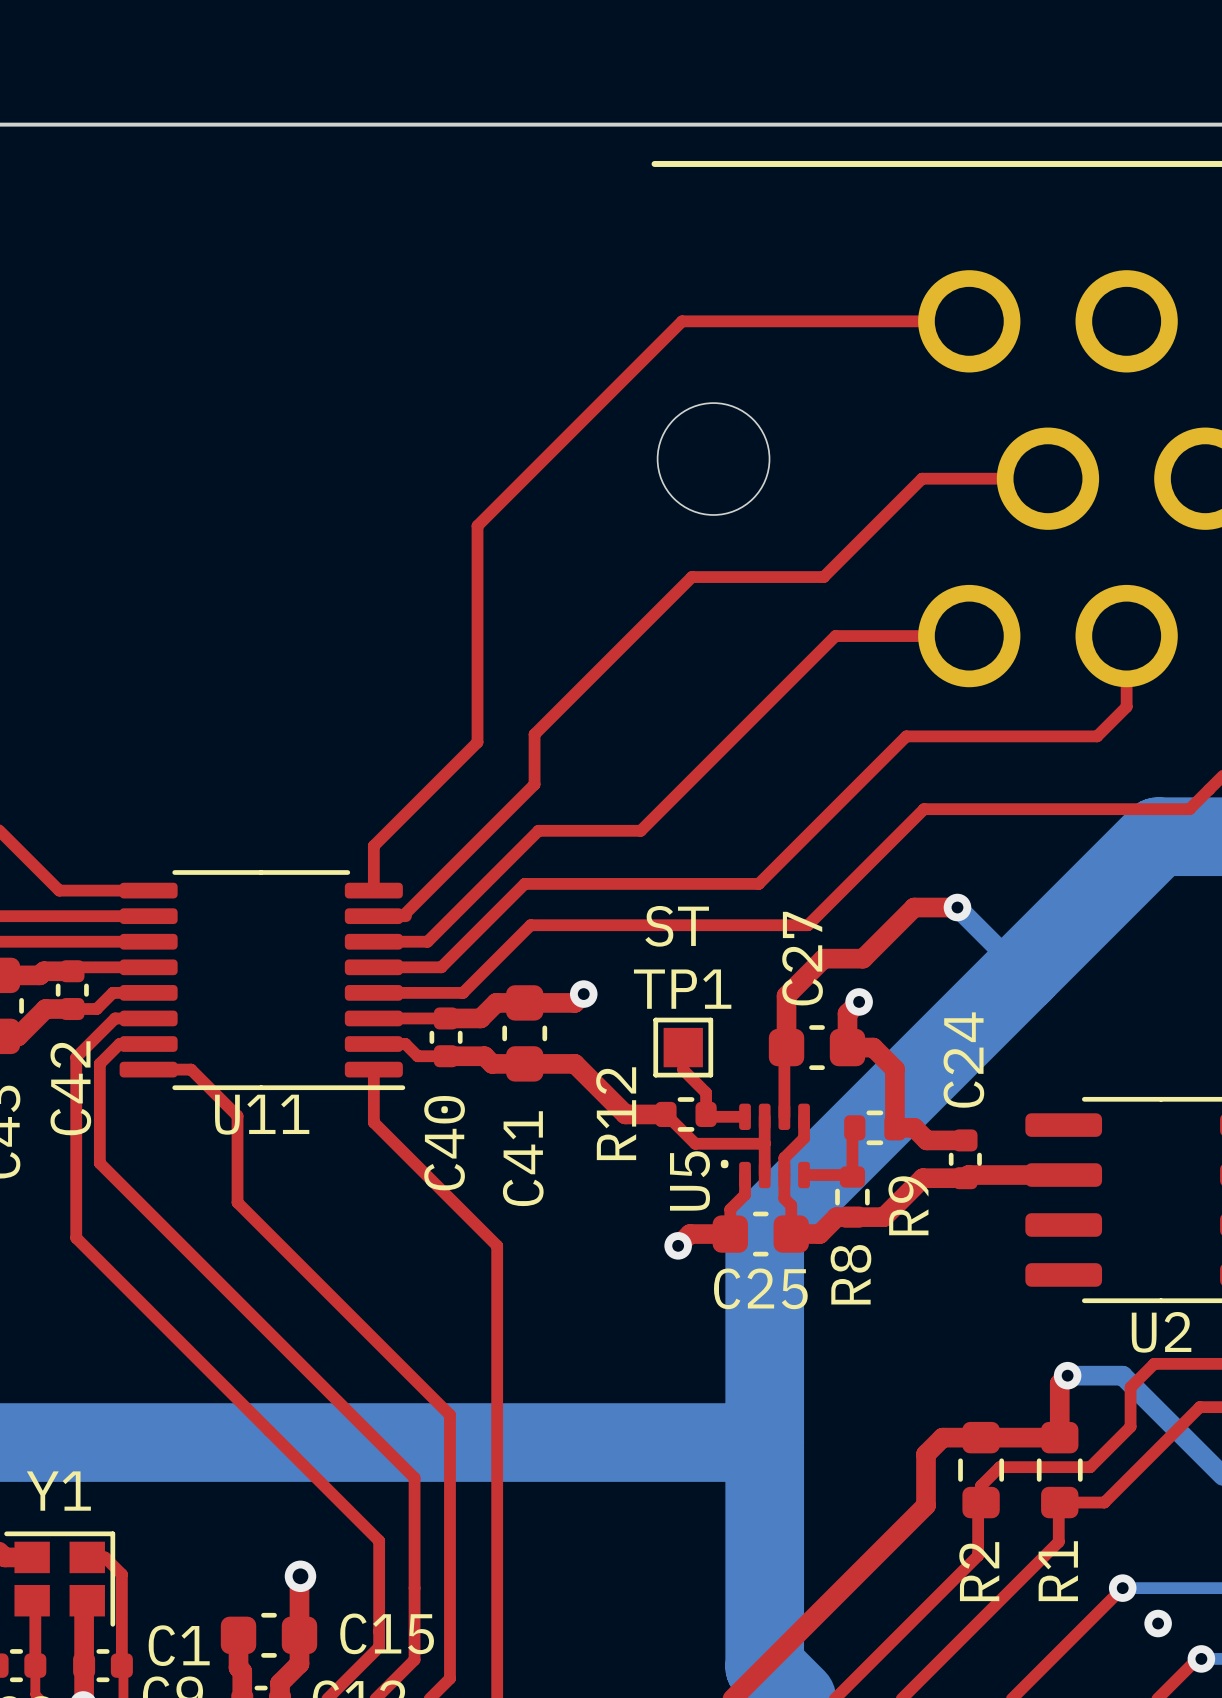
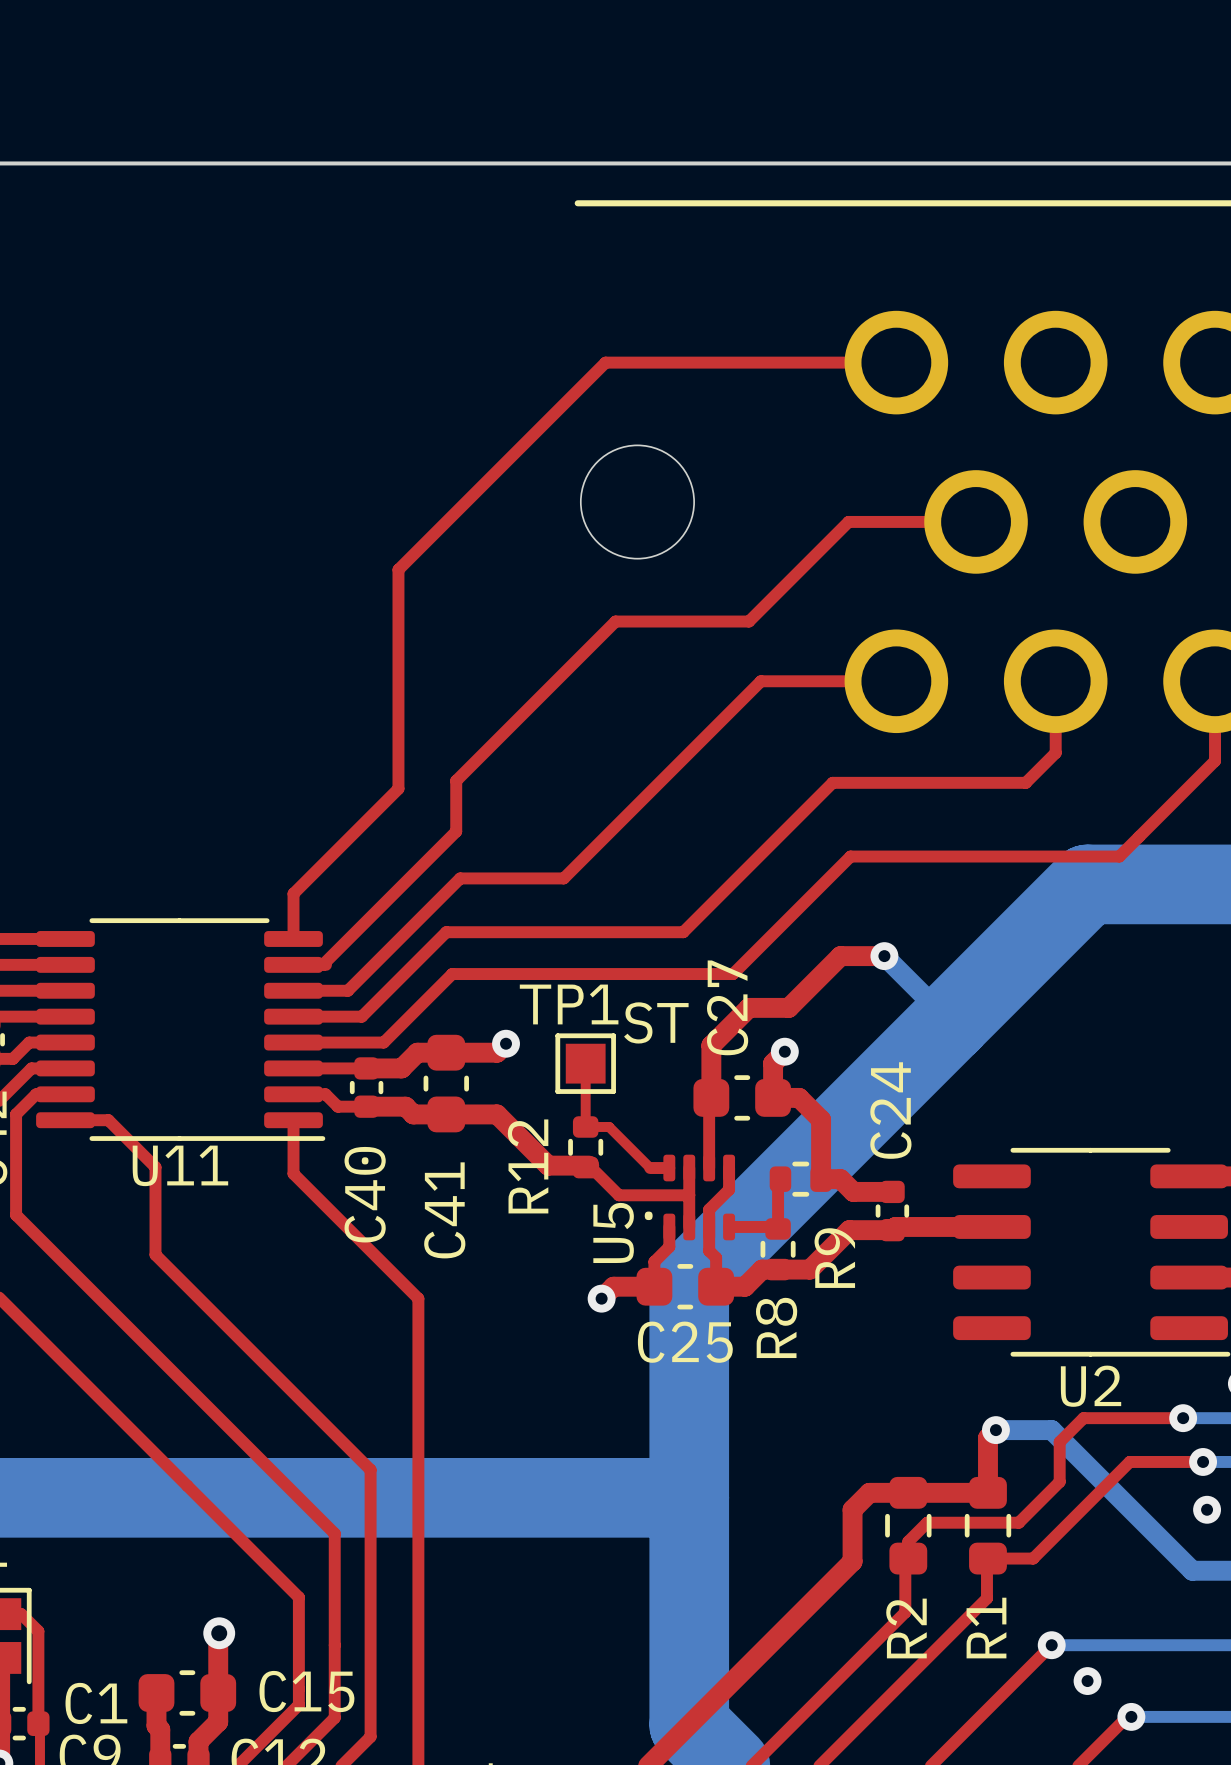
text position: ST (677, 926) -> ST (656, 1022)
TP1 name position: TP1 (682, 989) -> TP1 (569, 1004)
top track: (683, 1047) (683, 1069) (706, 1092) (706, 1114) (708, 1116) (726, 1116) -> (585, 1063) (585, 1126) (609, 1126) (650, 1168)
TP1 position: (683, 1047) -> (585, 1063)
R12 rotation: 0° (686, 1114) -> 90° clockwise (585, 1147)

